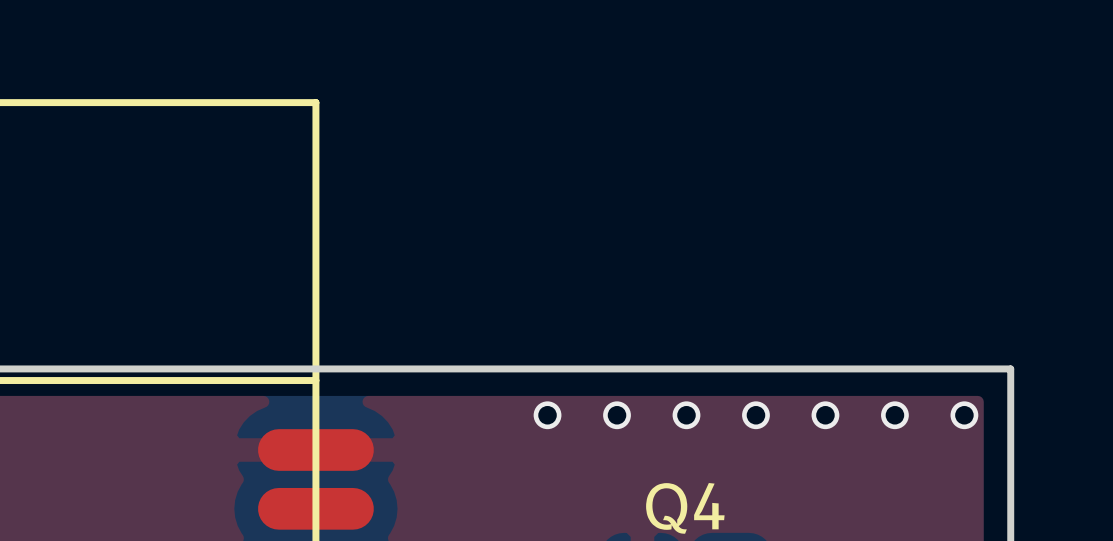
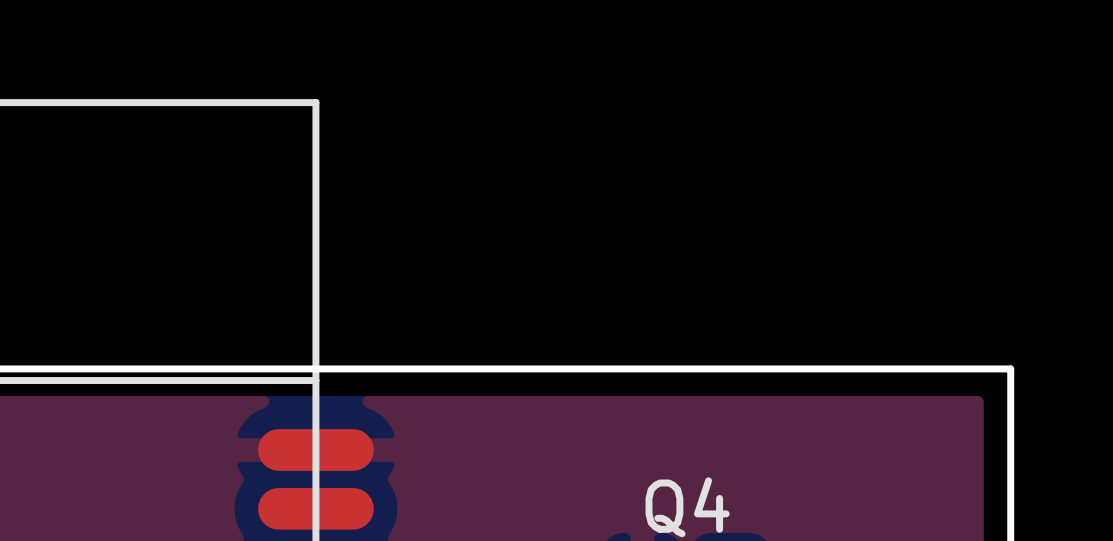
via: (547, 415) -> none
via: (617, 415) -> none
via: (686, 415) -> none
via: (755, 415) -> none
via: (825, 415) -> none
via: (894, 415) -> none
via: (964, 415) -> none

